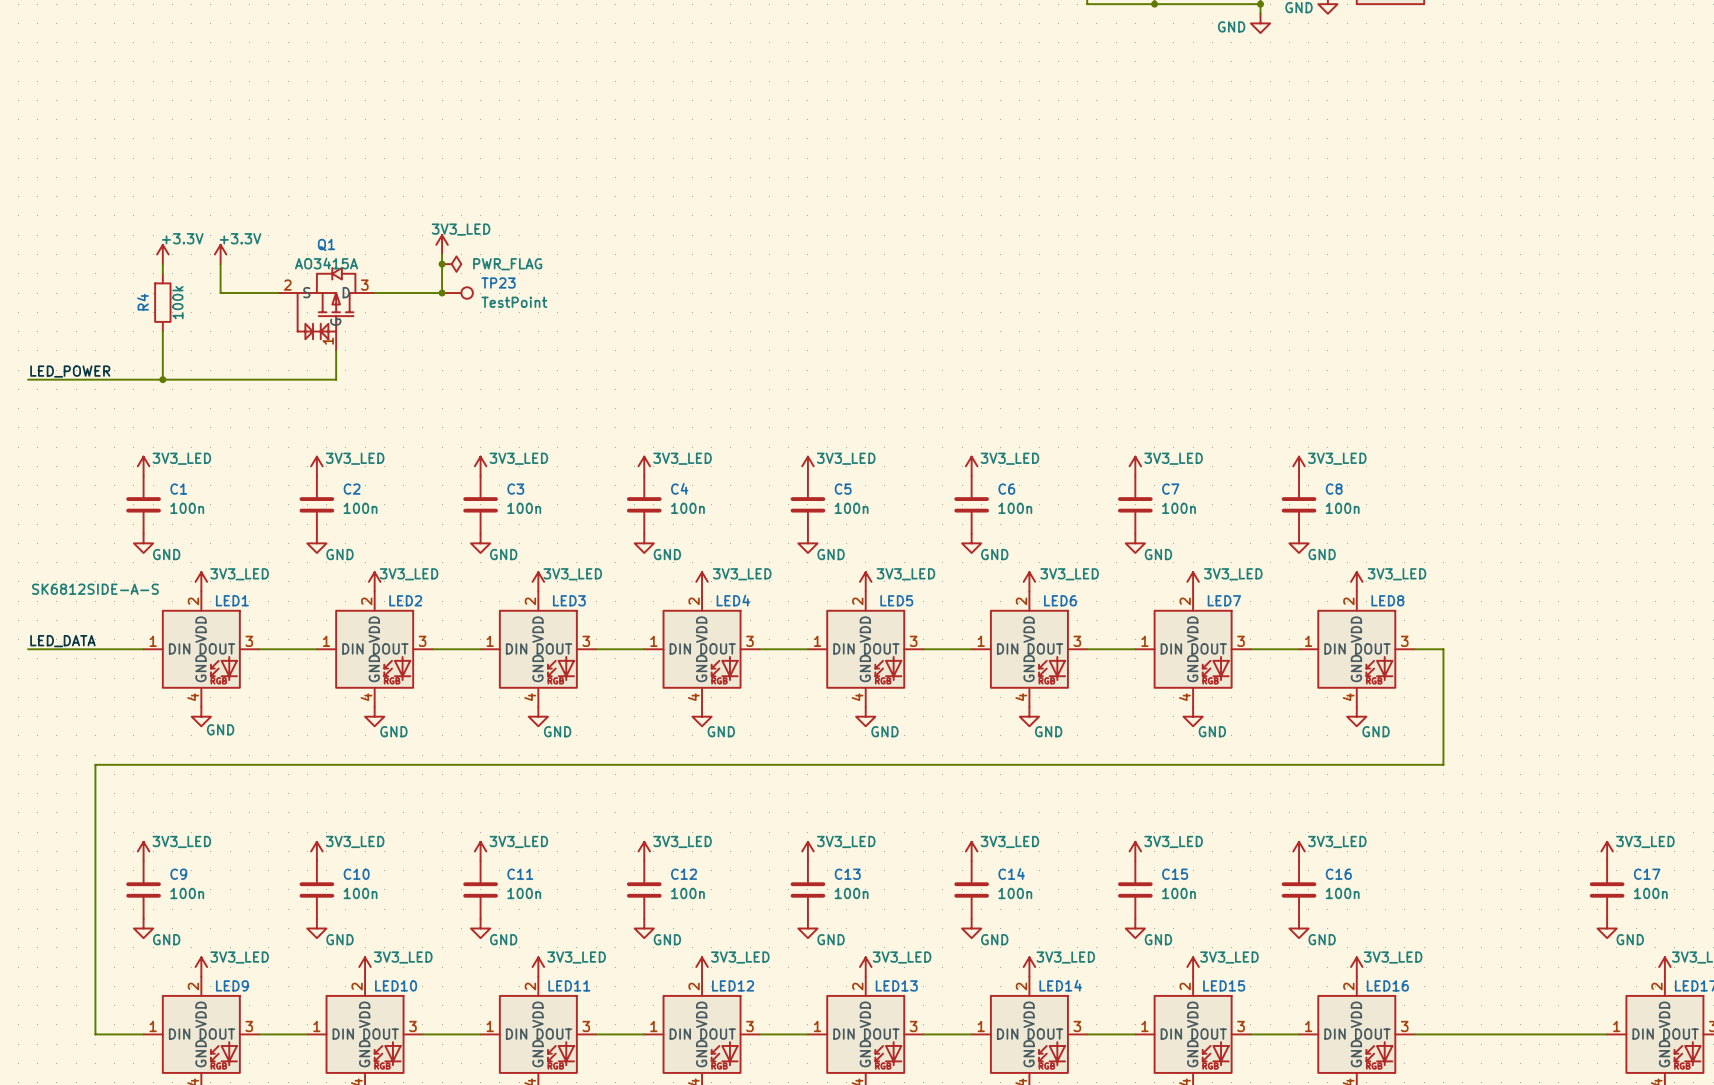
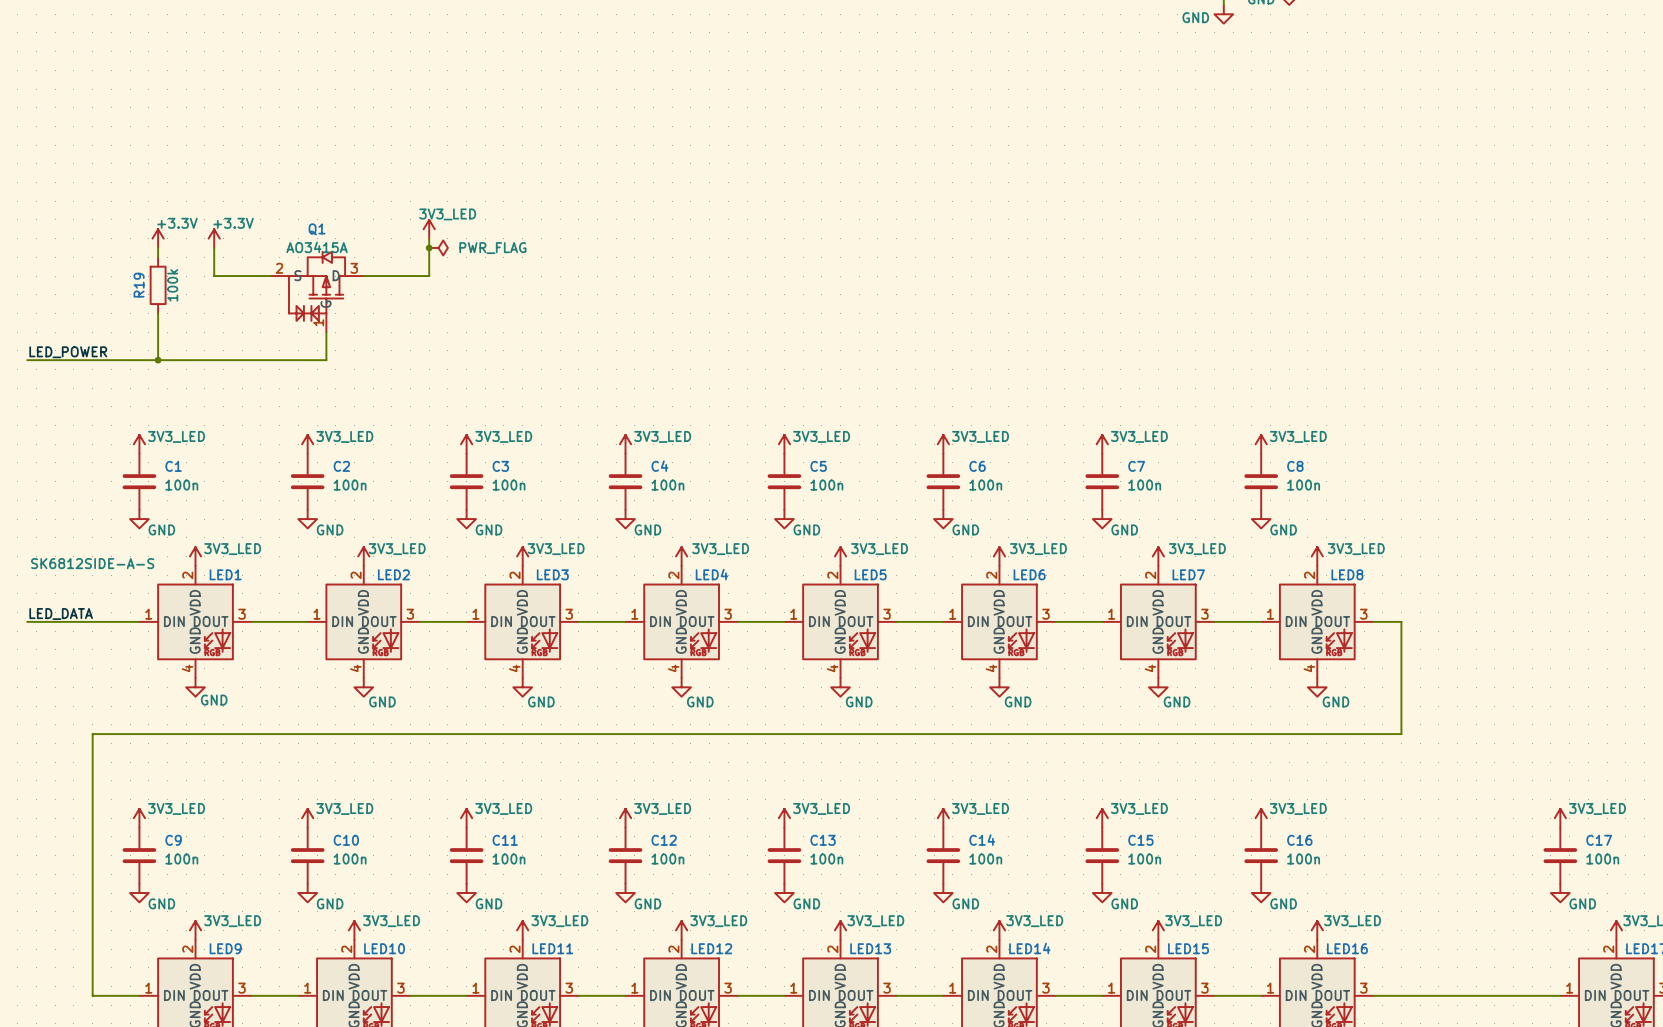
junction: (442, 293) -> none
TP23: TestPoint (457, 293) -> none
R4 name: R4 (142, 302) -> R19 (139, 285)

